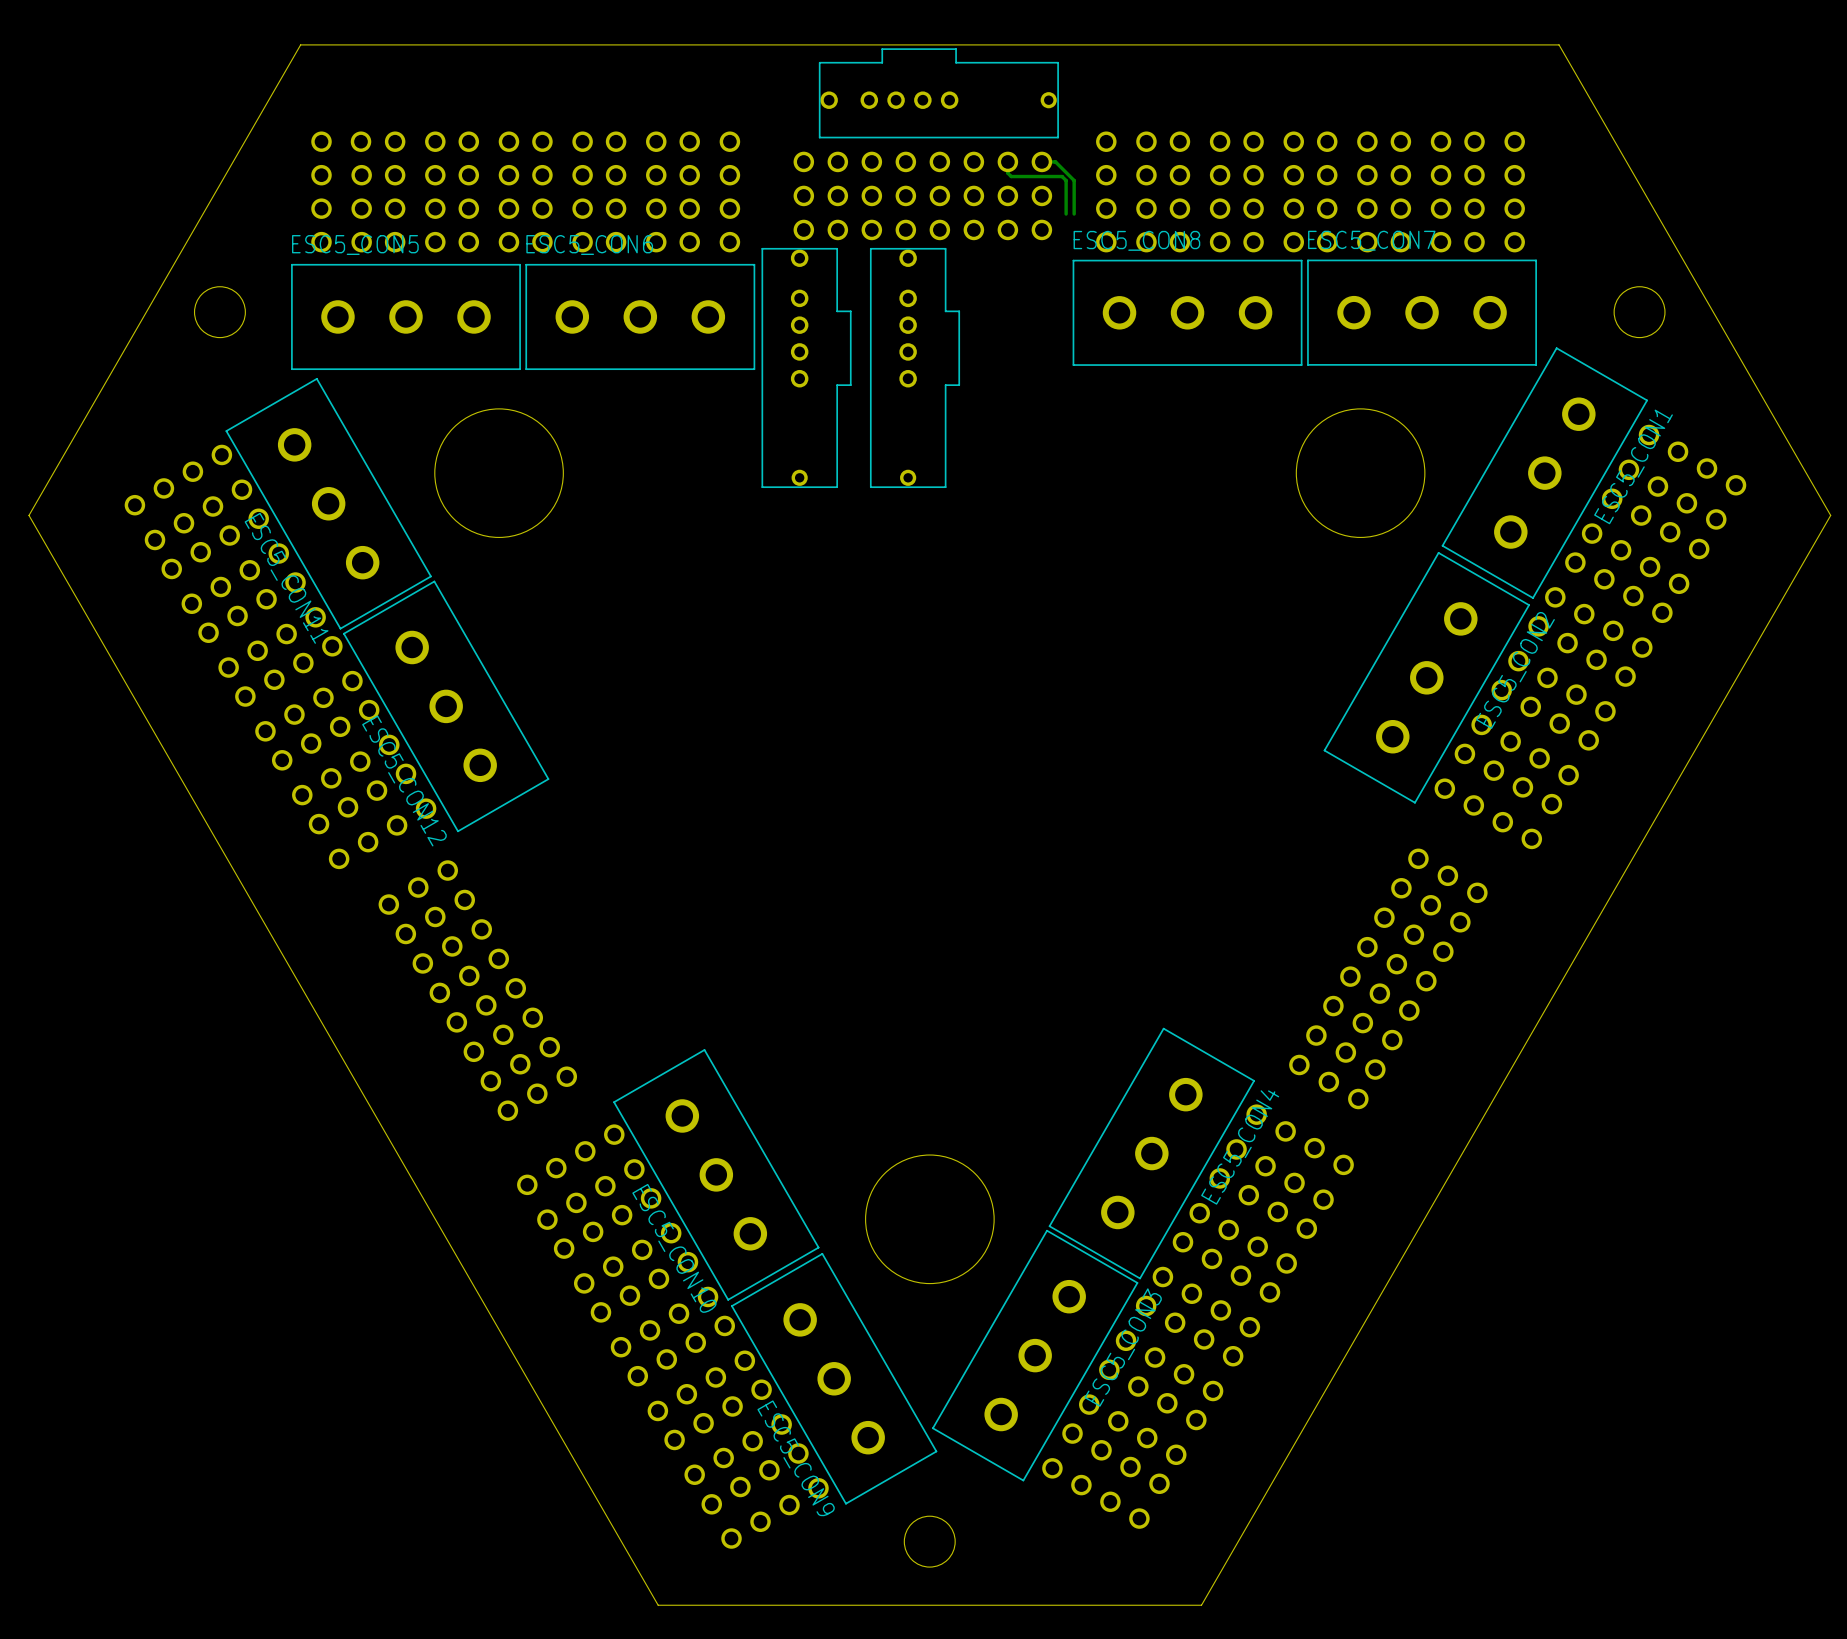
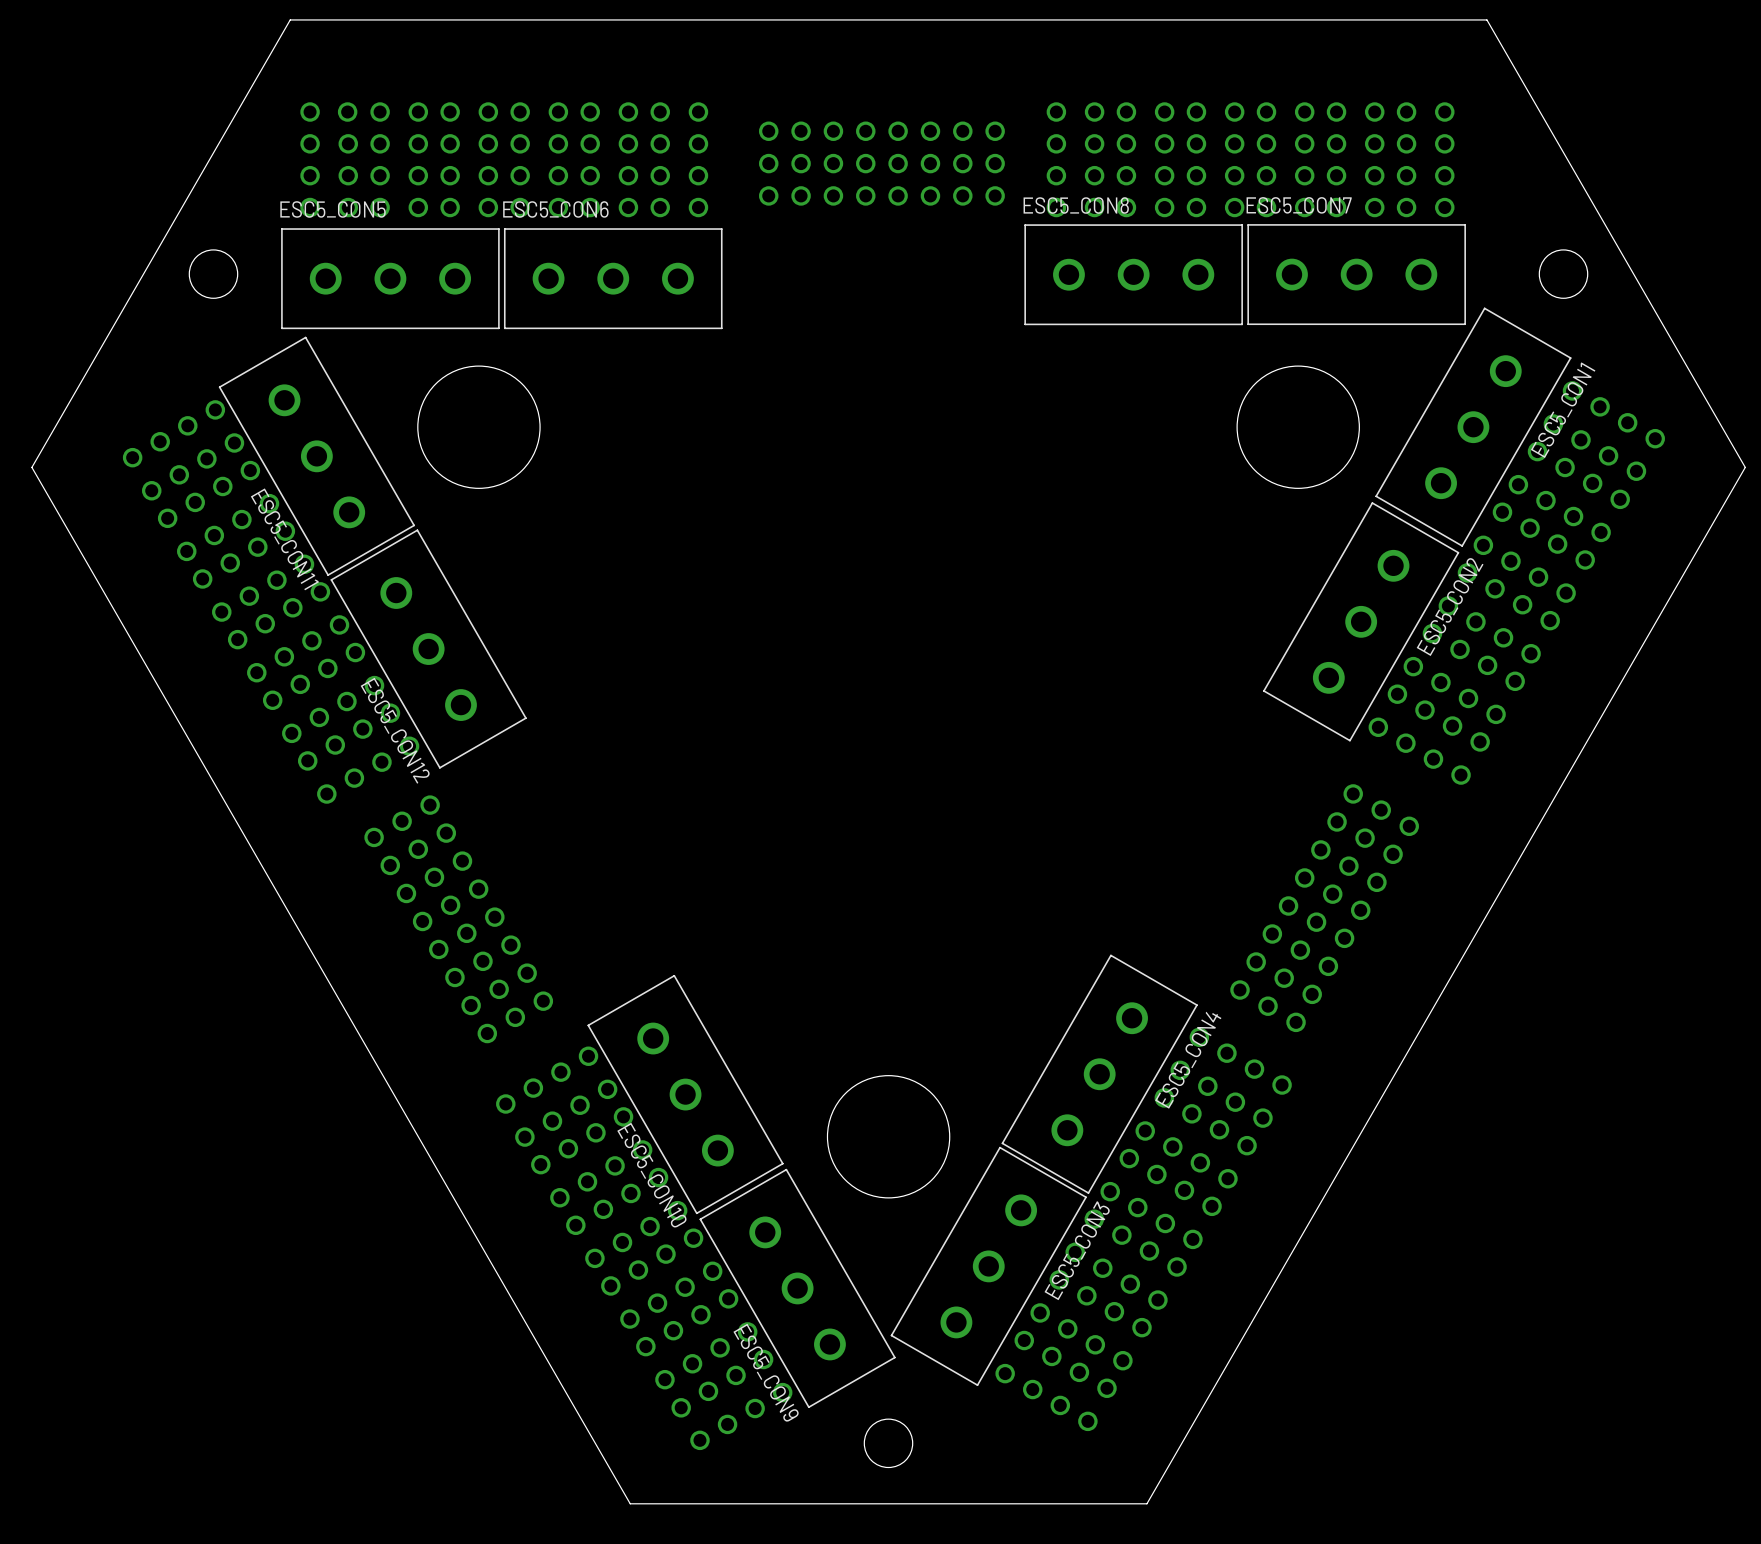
part: (938, 93) -> none
track: (1007, 161) (1007, 173) (1011, 176) (1062, 176) (1066, 180) (1066, 214) -> none
track: (1041, 161) (1055, 161) (1074, 180) (1074, 214) -> none
part: (806, 367) -> none
part: (915, 367) -> none

